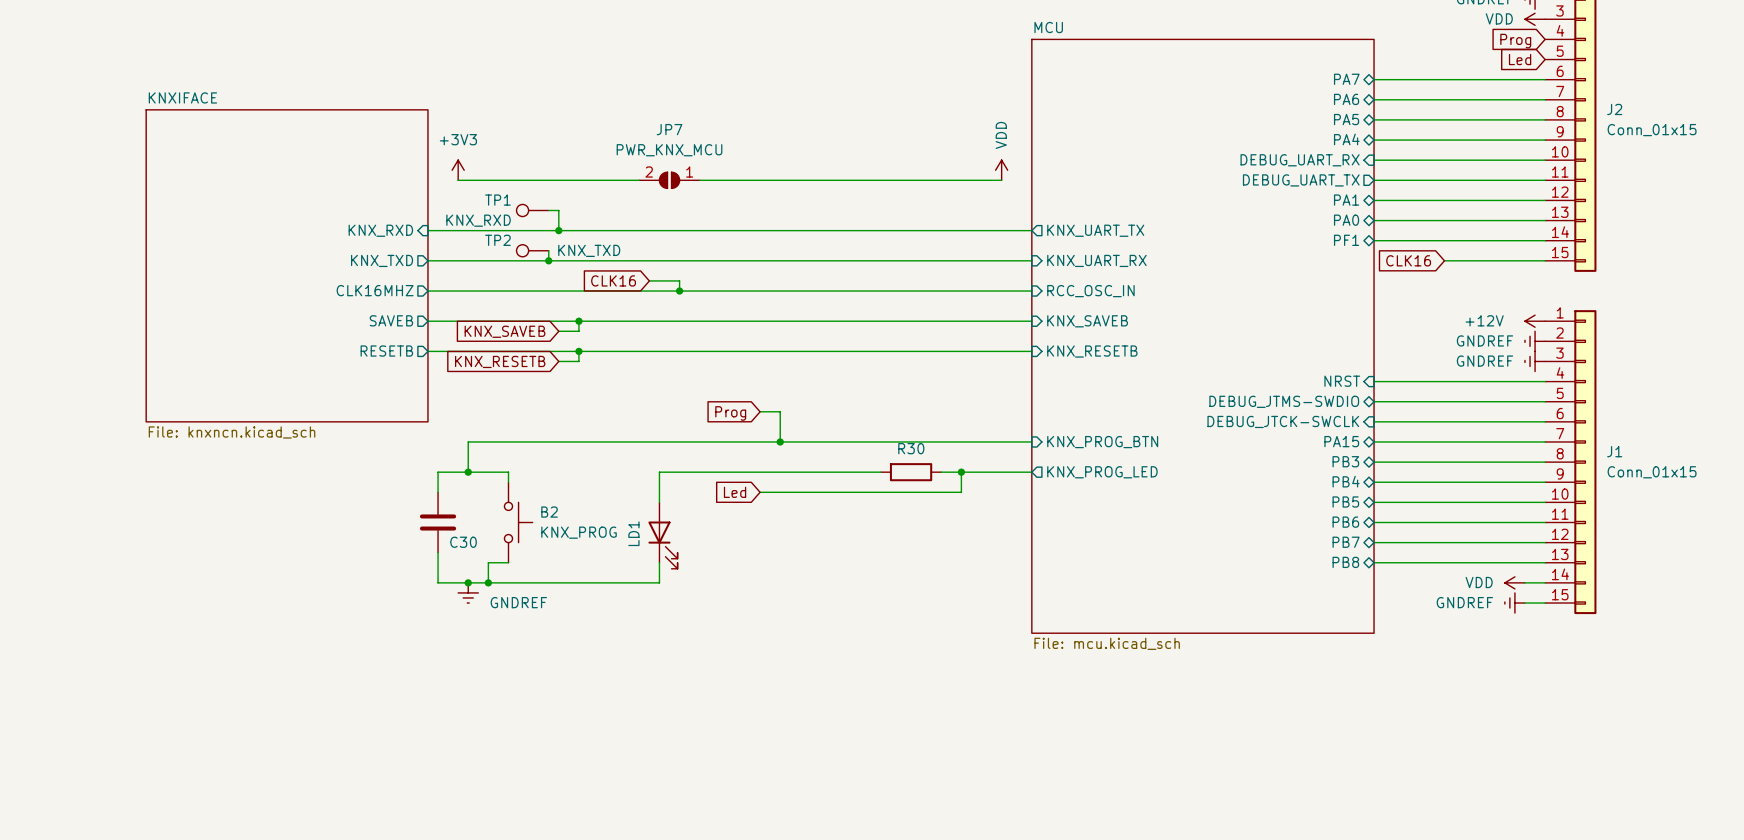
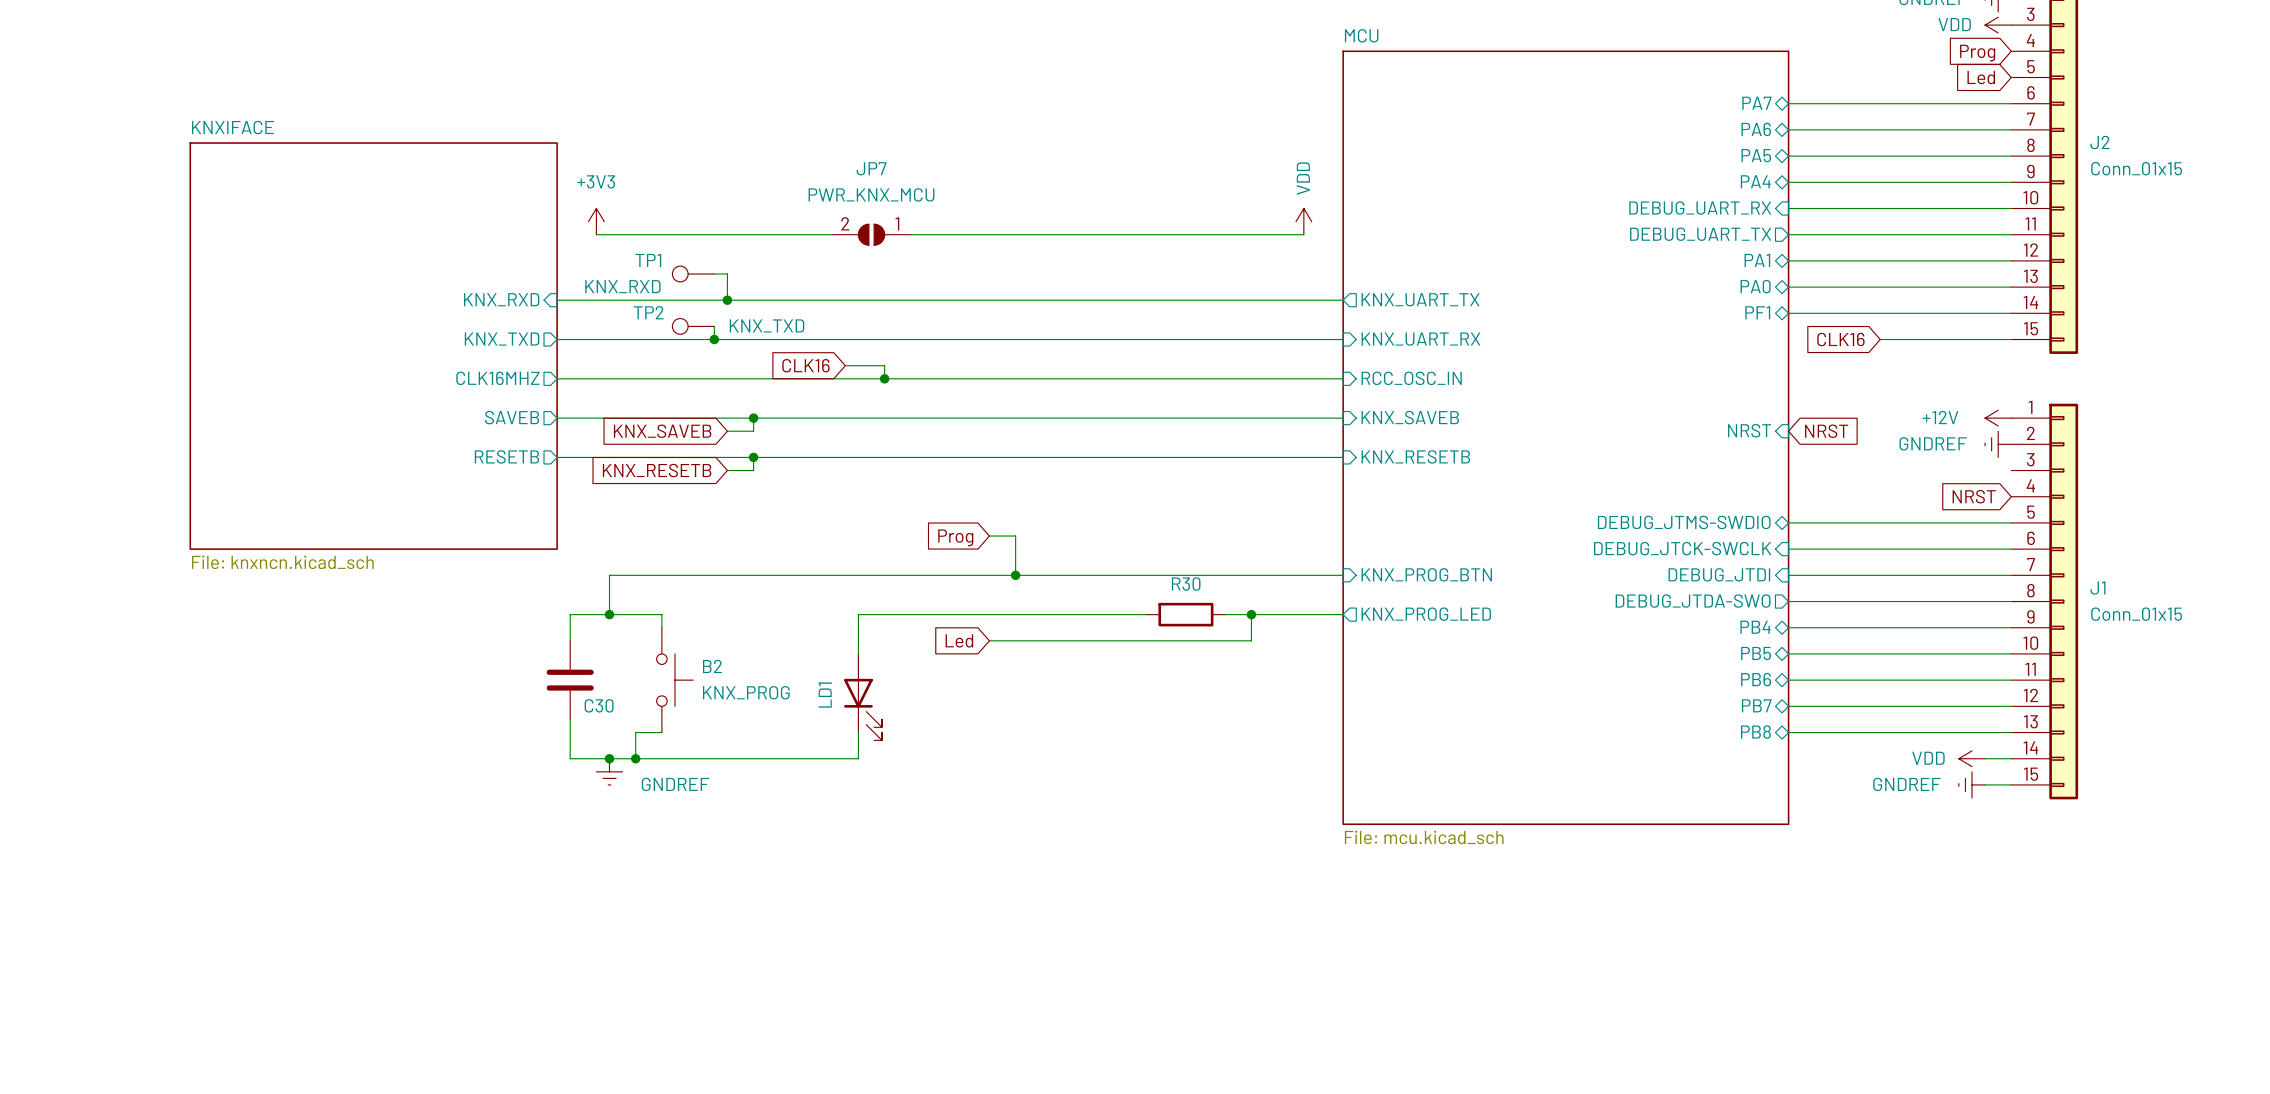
global label: none -> NRST (1826, 431)
power symbol: GNDREF (1535, 361) -> none
sheet pin position: NRST (1342, 381) -> NRST (1749, 430)
wire: (1374, 381) (1545, 381) -> none
global label: none -> NRST (1974, 496)
sheet pin shape: bidirectional (1341, 441) -> input (1719, 574)
sheet pin: PA15 (1341, 441) -> DEBUG_JTDI (1719, 574)
sheet pin shape: bidirectional (1345, 461) -> output (1693, 601)
sheet pin: PB3 (1345, 461) -> DEBUG_JTDA-SWO (1693, 601)

